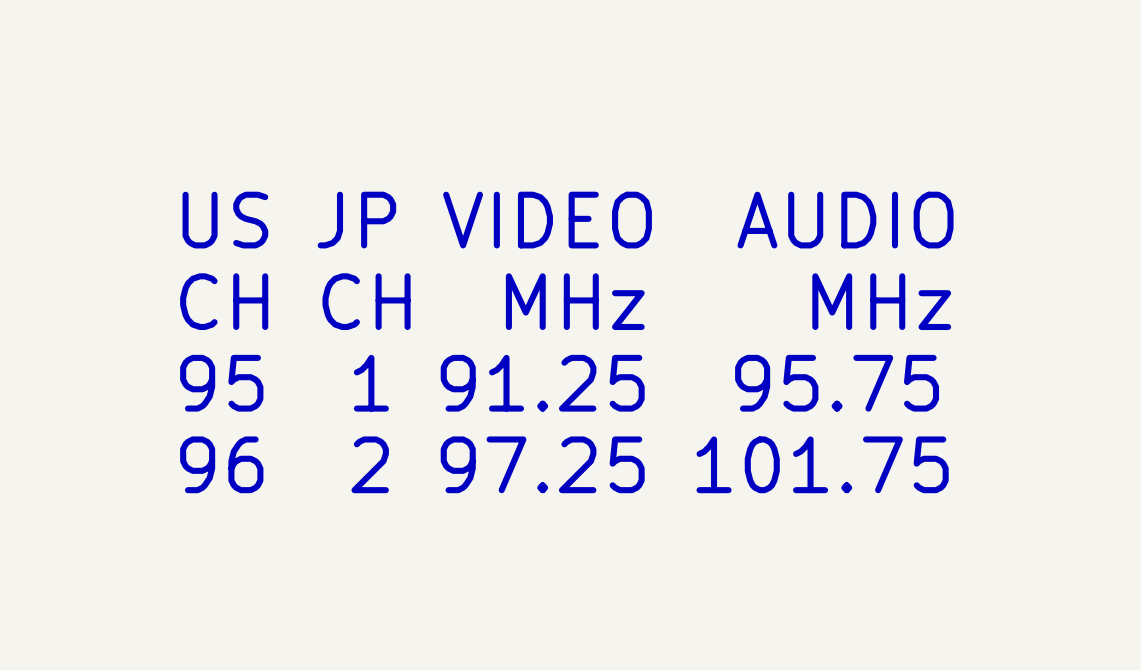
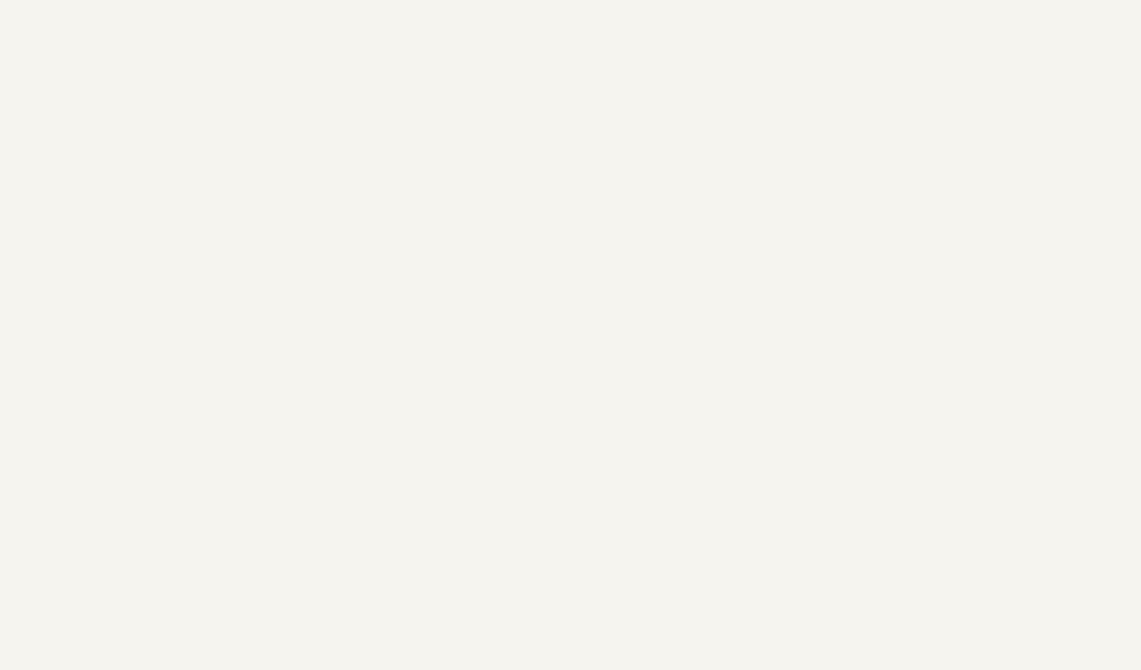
text: US JP VIDEO AUDIO (568, 220) -> none
text: CH CH MHz MHz (565, 301) -> none
text: 95 1 91.25 95.75 (559, 383) -> none
text: 96 2 97.25 101.75 (564, 464) -> none

